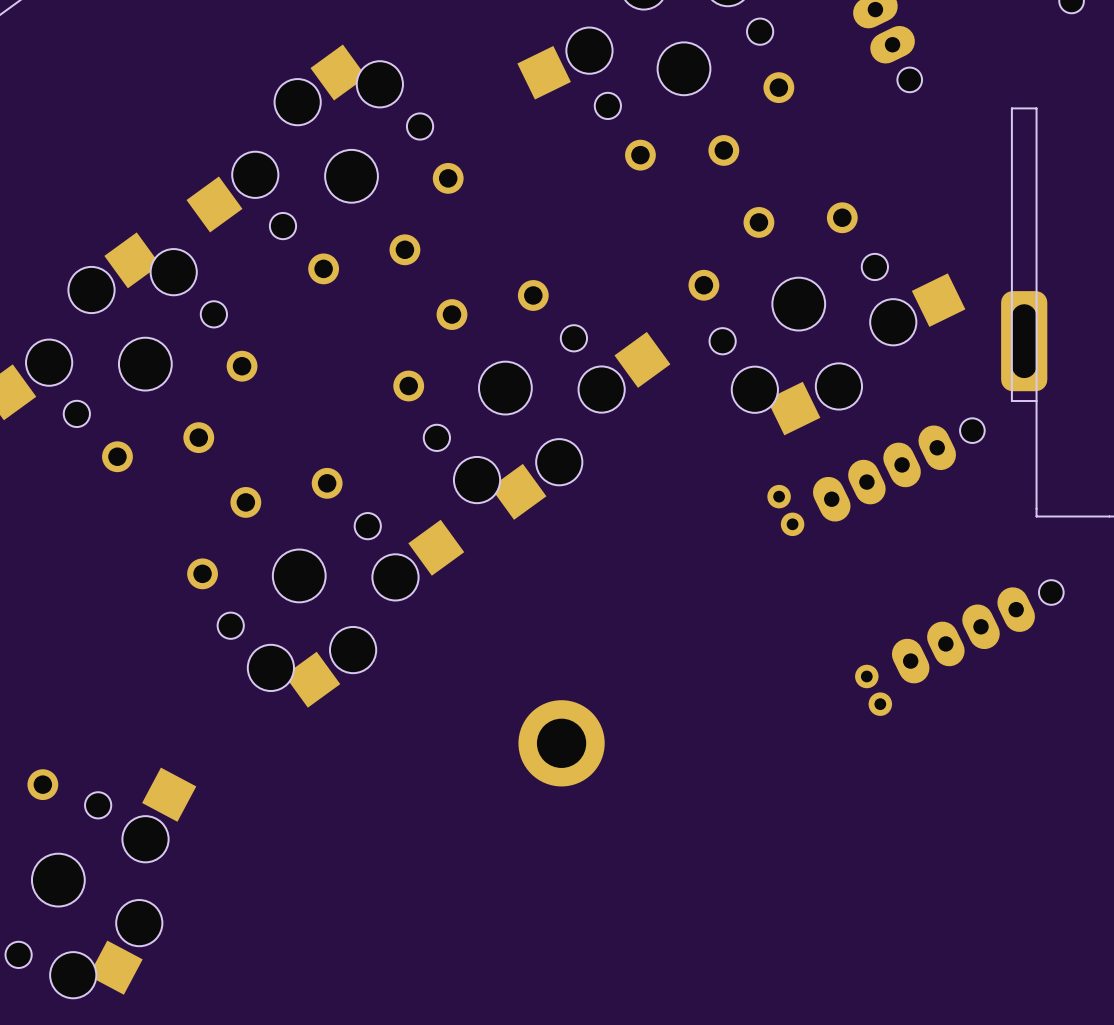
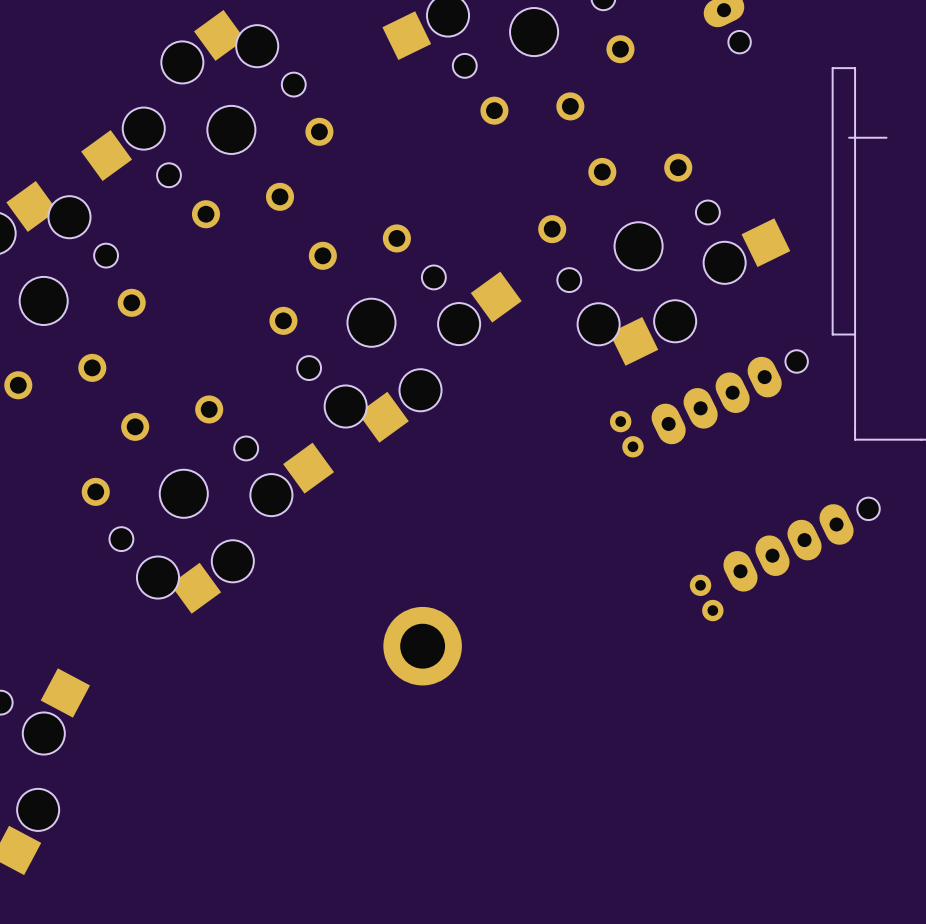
board edge: none -> (849, 137) (886, 137)
part: (1024, 341) -> none

